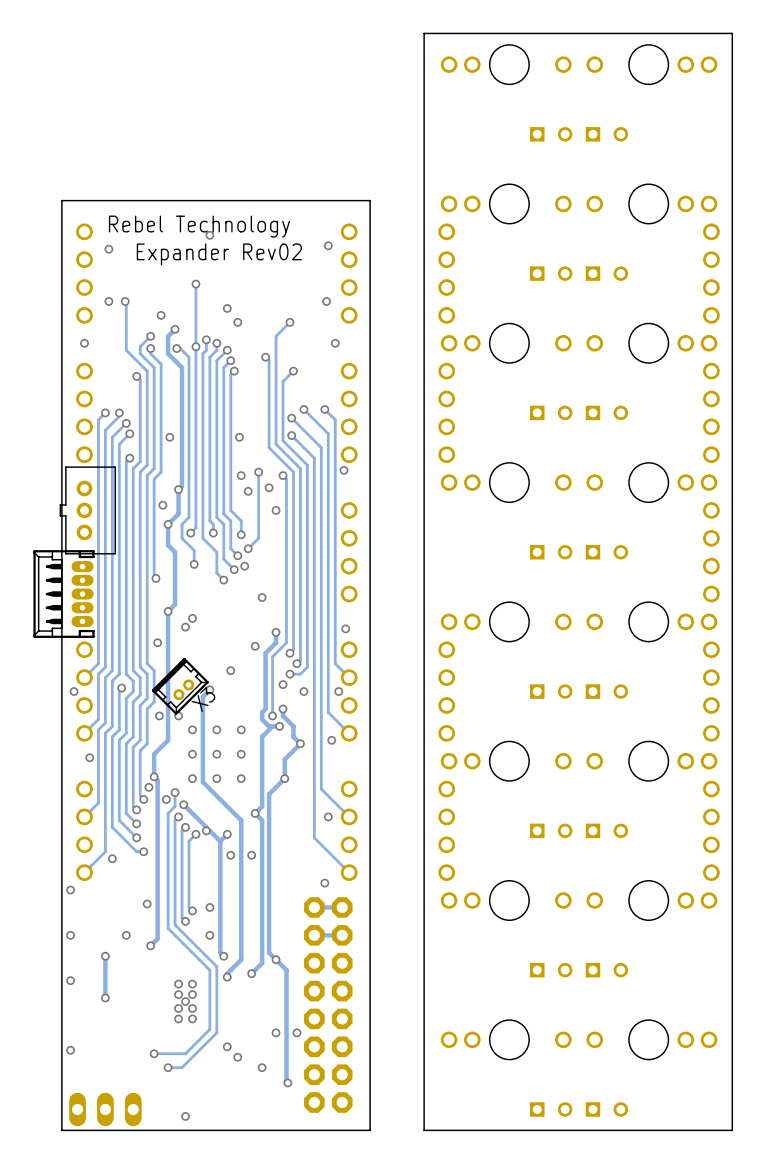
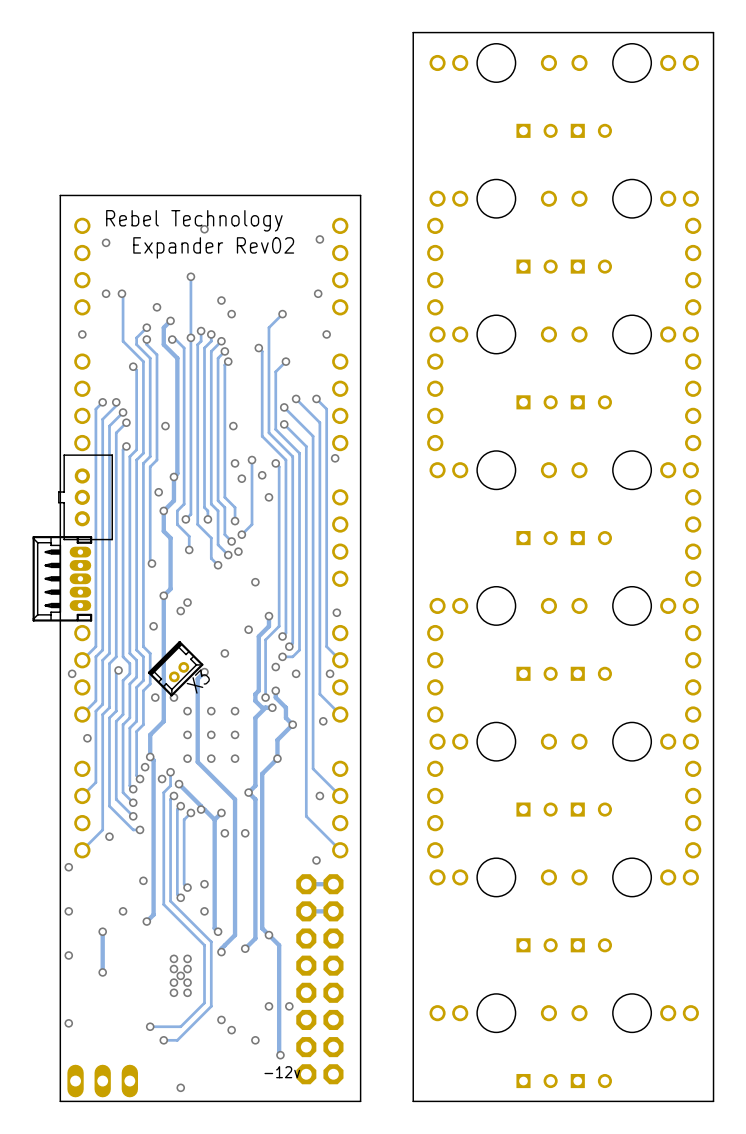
text: none -> -12v (282, 1072)

